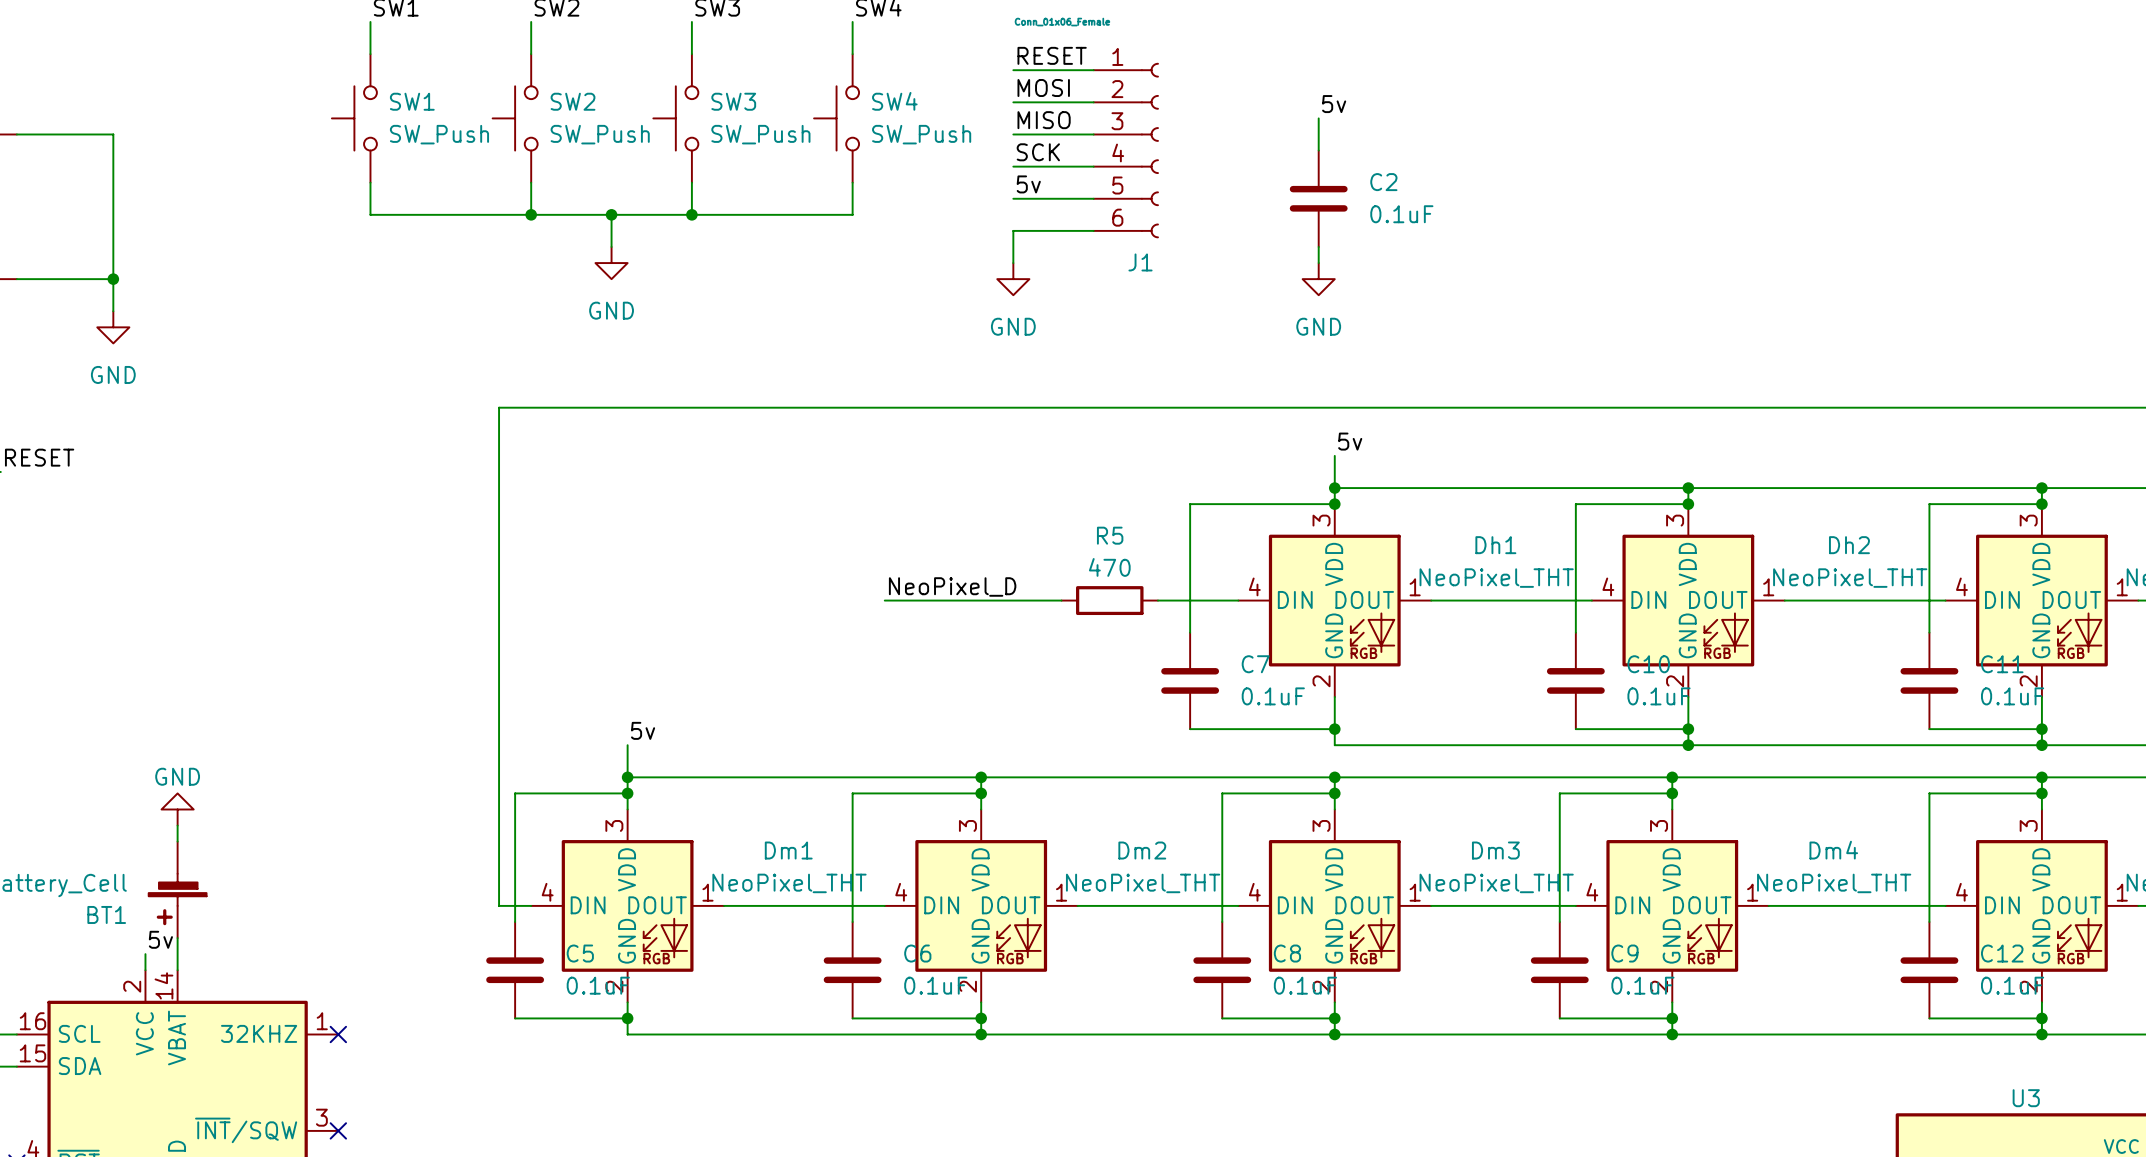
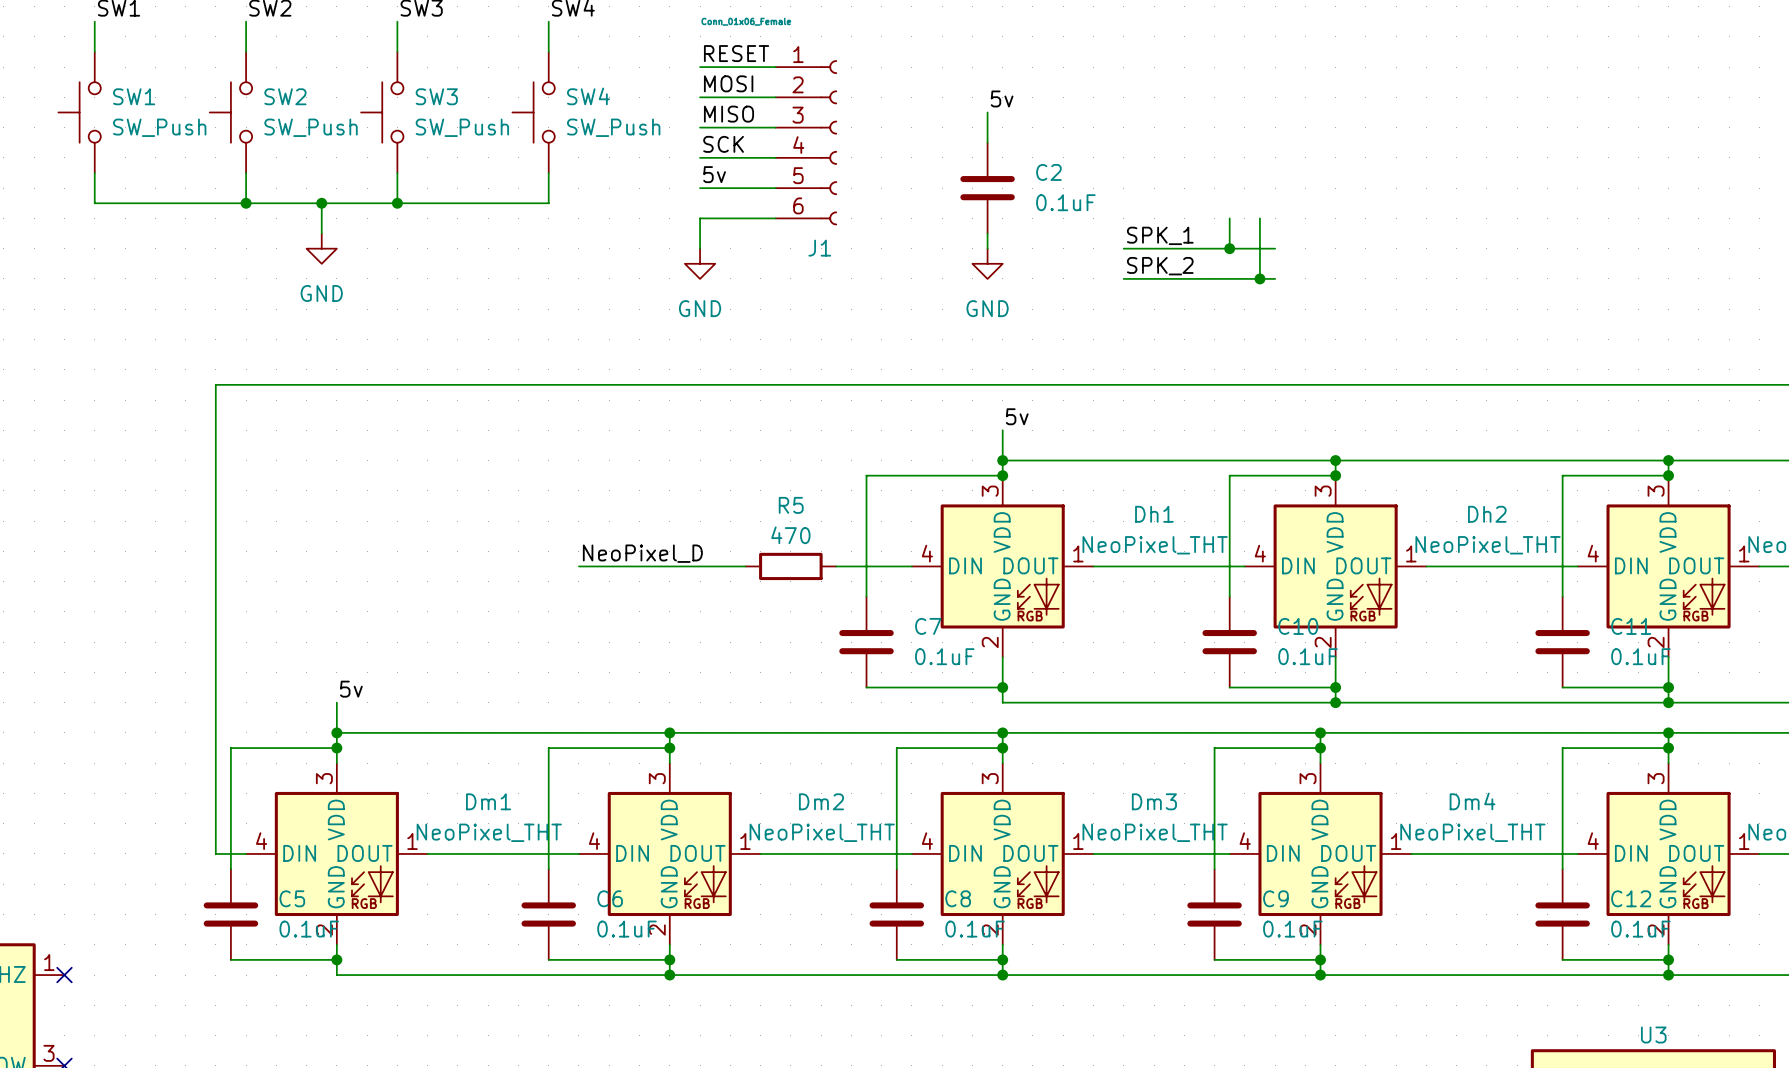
wire: none -> (1229, 218) (1229, 248)
wire: none -> (1259, 218) (1259, 278)
label: none -> SPK_1 (1160, 235)
wire: none -> (1123, 248) (1275, 248)
junction: none -> (1229, 248)
label: none -> SPK_2 (1160, 266)
wire: none -> (1123, 278) (1275, 278)
junction: none -> (1259, 278)

